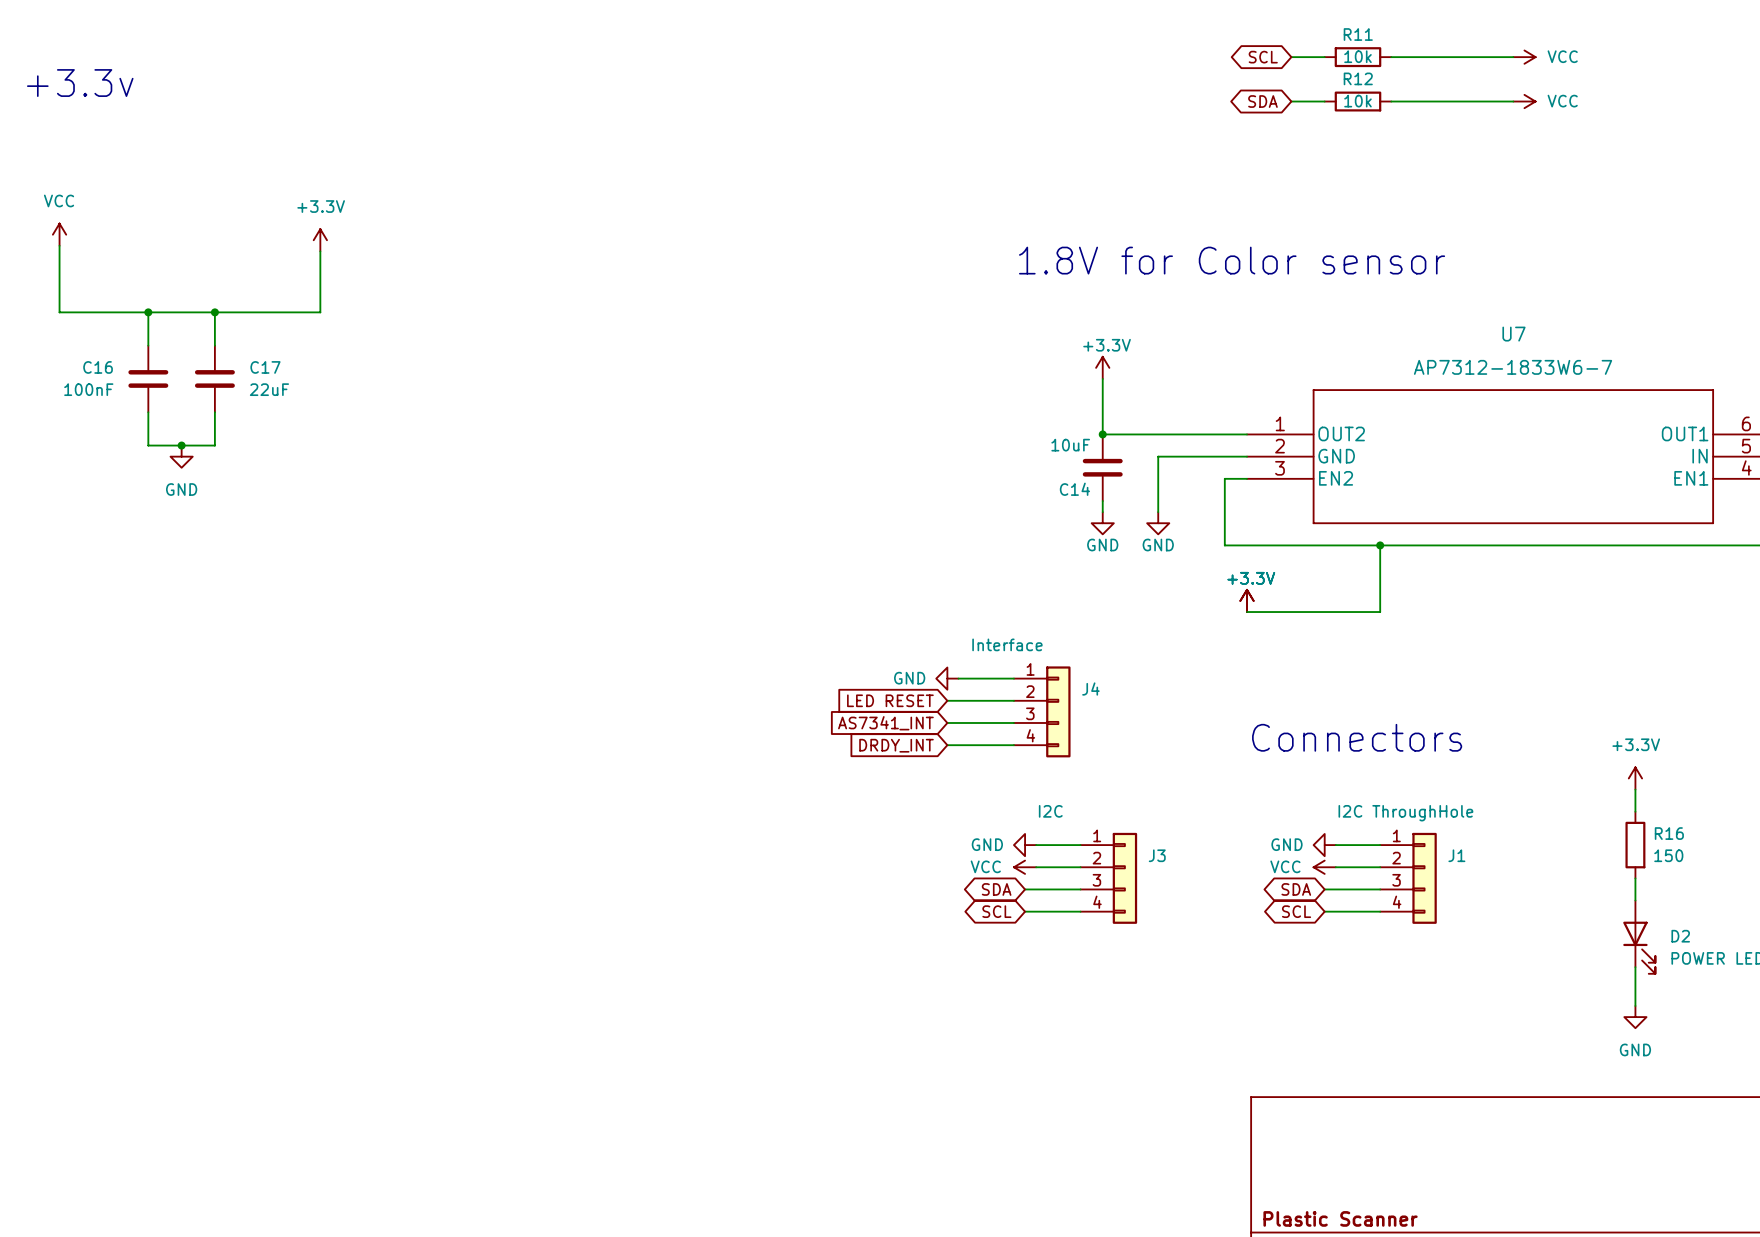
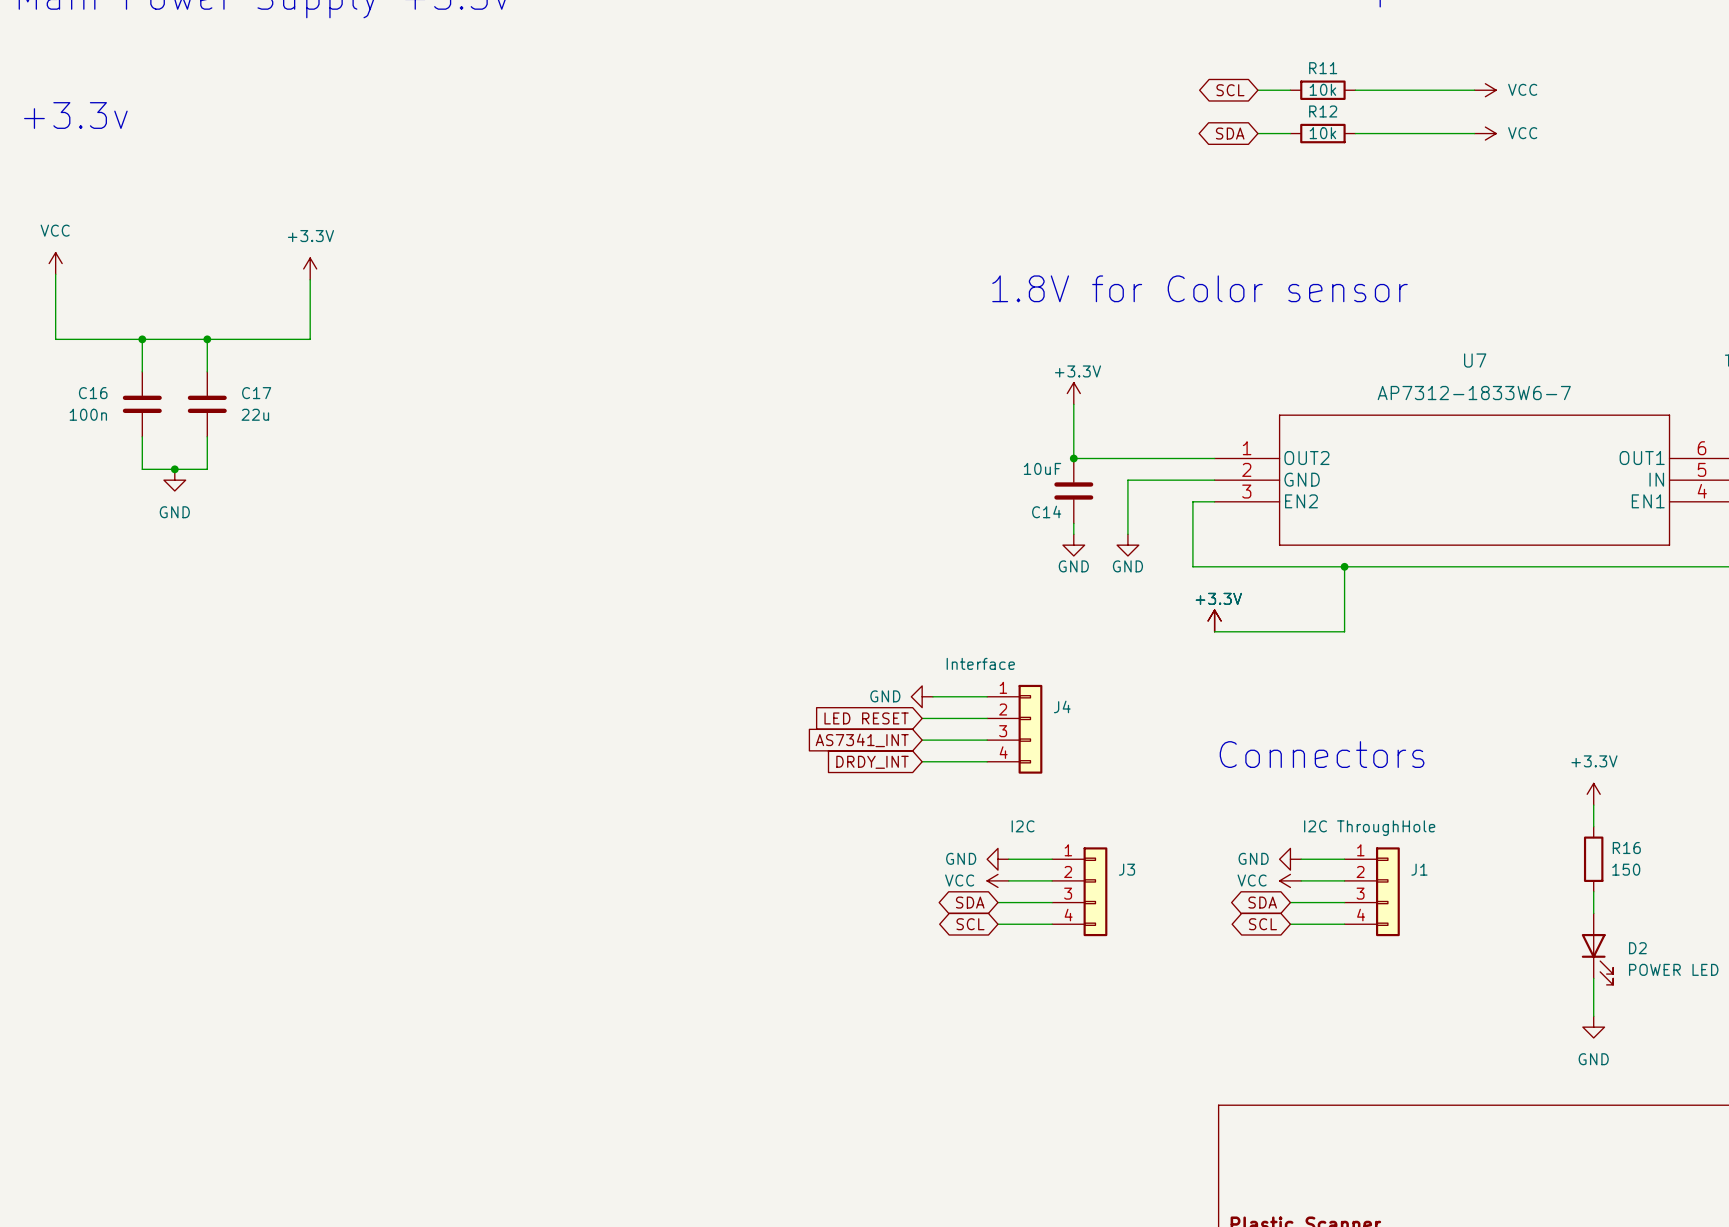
C16 value: 100nF (88, 389) -> 100n (88, 414)
C17 value: 22uF (269, 389) -> 22u (255, 414)

